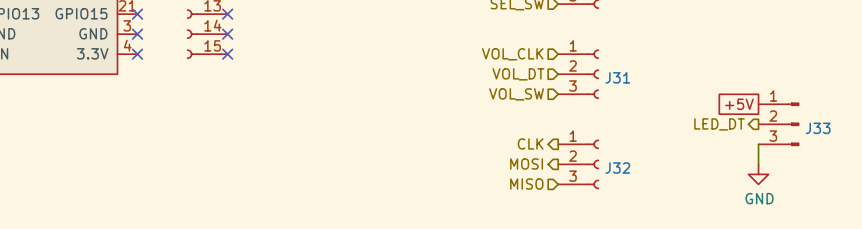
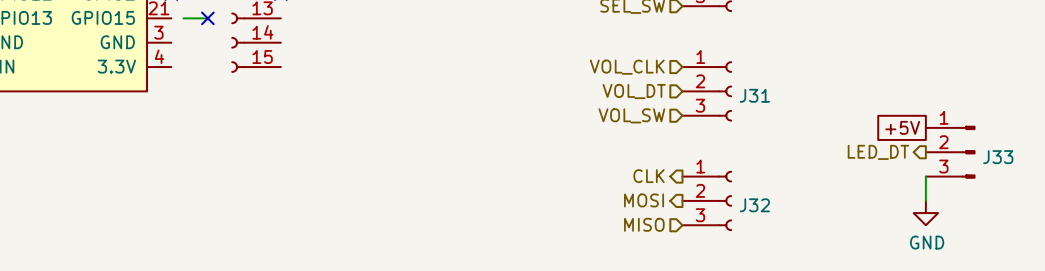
no-connect mark: (137, 14) -> none
wire: none -> (183, 18) (207, 18)
no-connect mark: none -> (207, 18)
no-connect mark: (227, 14) -> none
no-connect mark: (137, 34) -> none
no-connect mark: (227, 34) -> none
no-connect mark: (137, 54) -> none
no-connect mark: (227, 54) -> none

